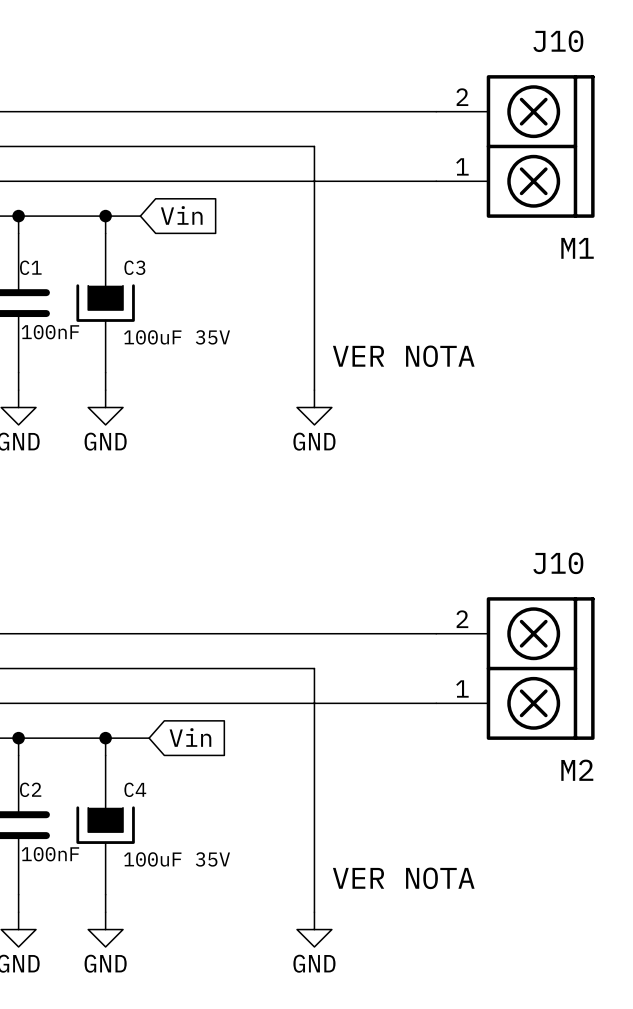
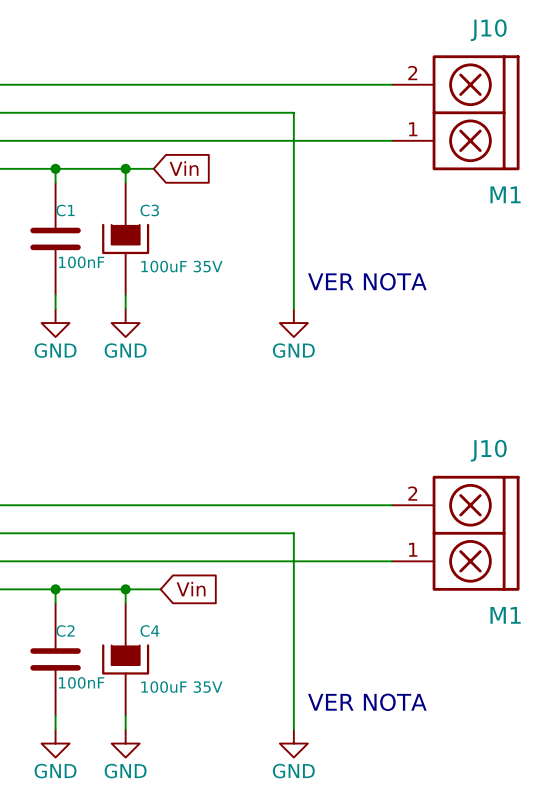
J10 value: M2 (577, 770) -> M1 (505, 615)

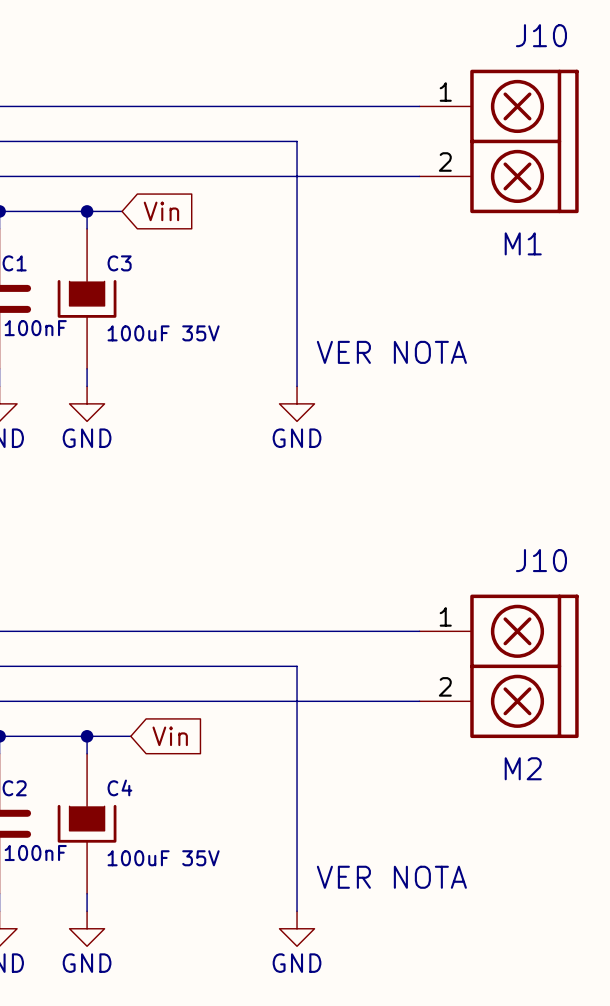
J10 flip: as is (476, 112) -> up-down (524, 141)
J10 value position: M1 (505, 194) -> M1 (523, 243)
J10 flip: as is (476, 533) -> up-down (524, 666)
J10 value: M1 (505, 615) -> M2 (523, 768)

